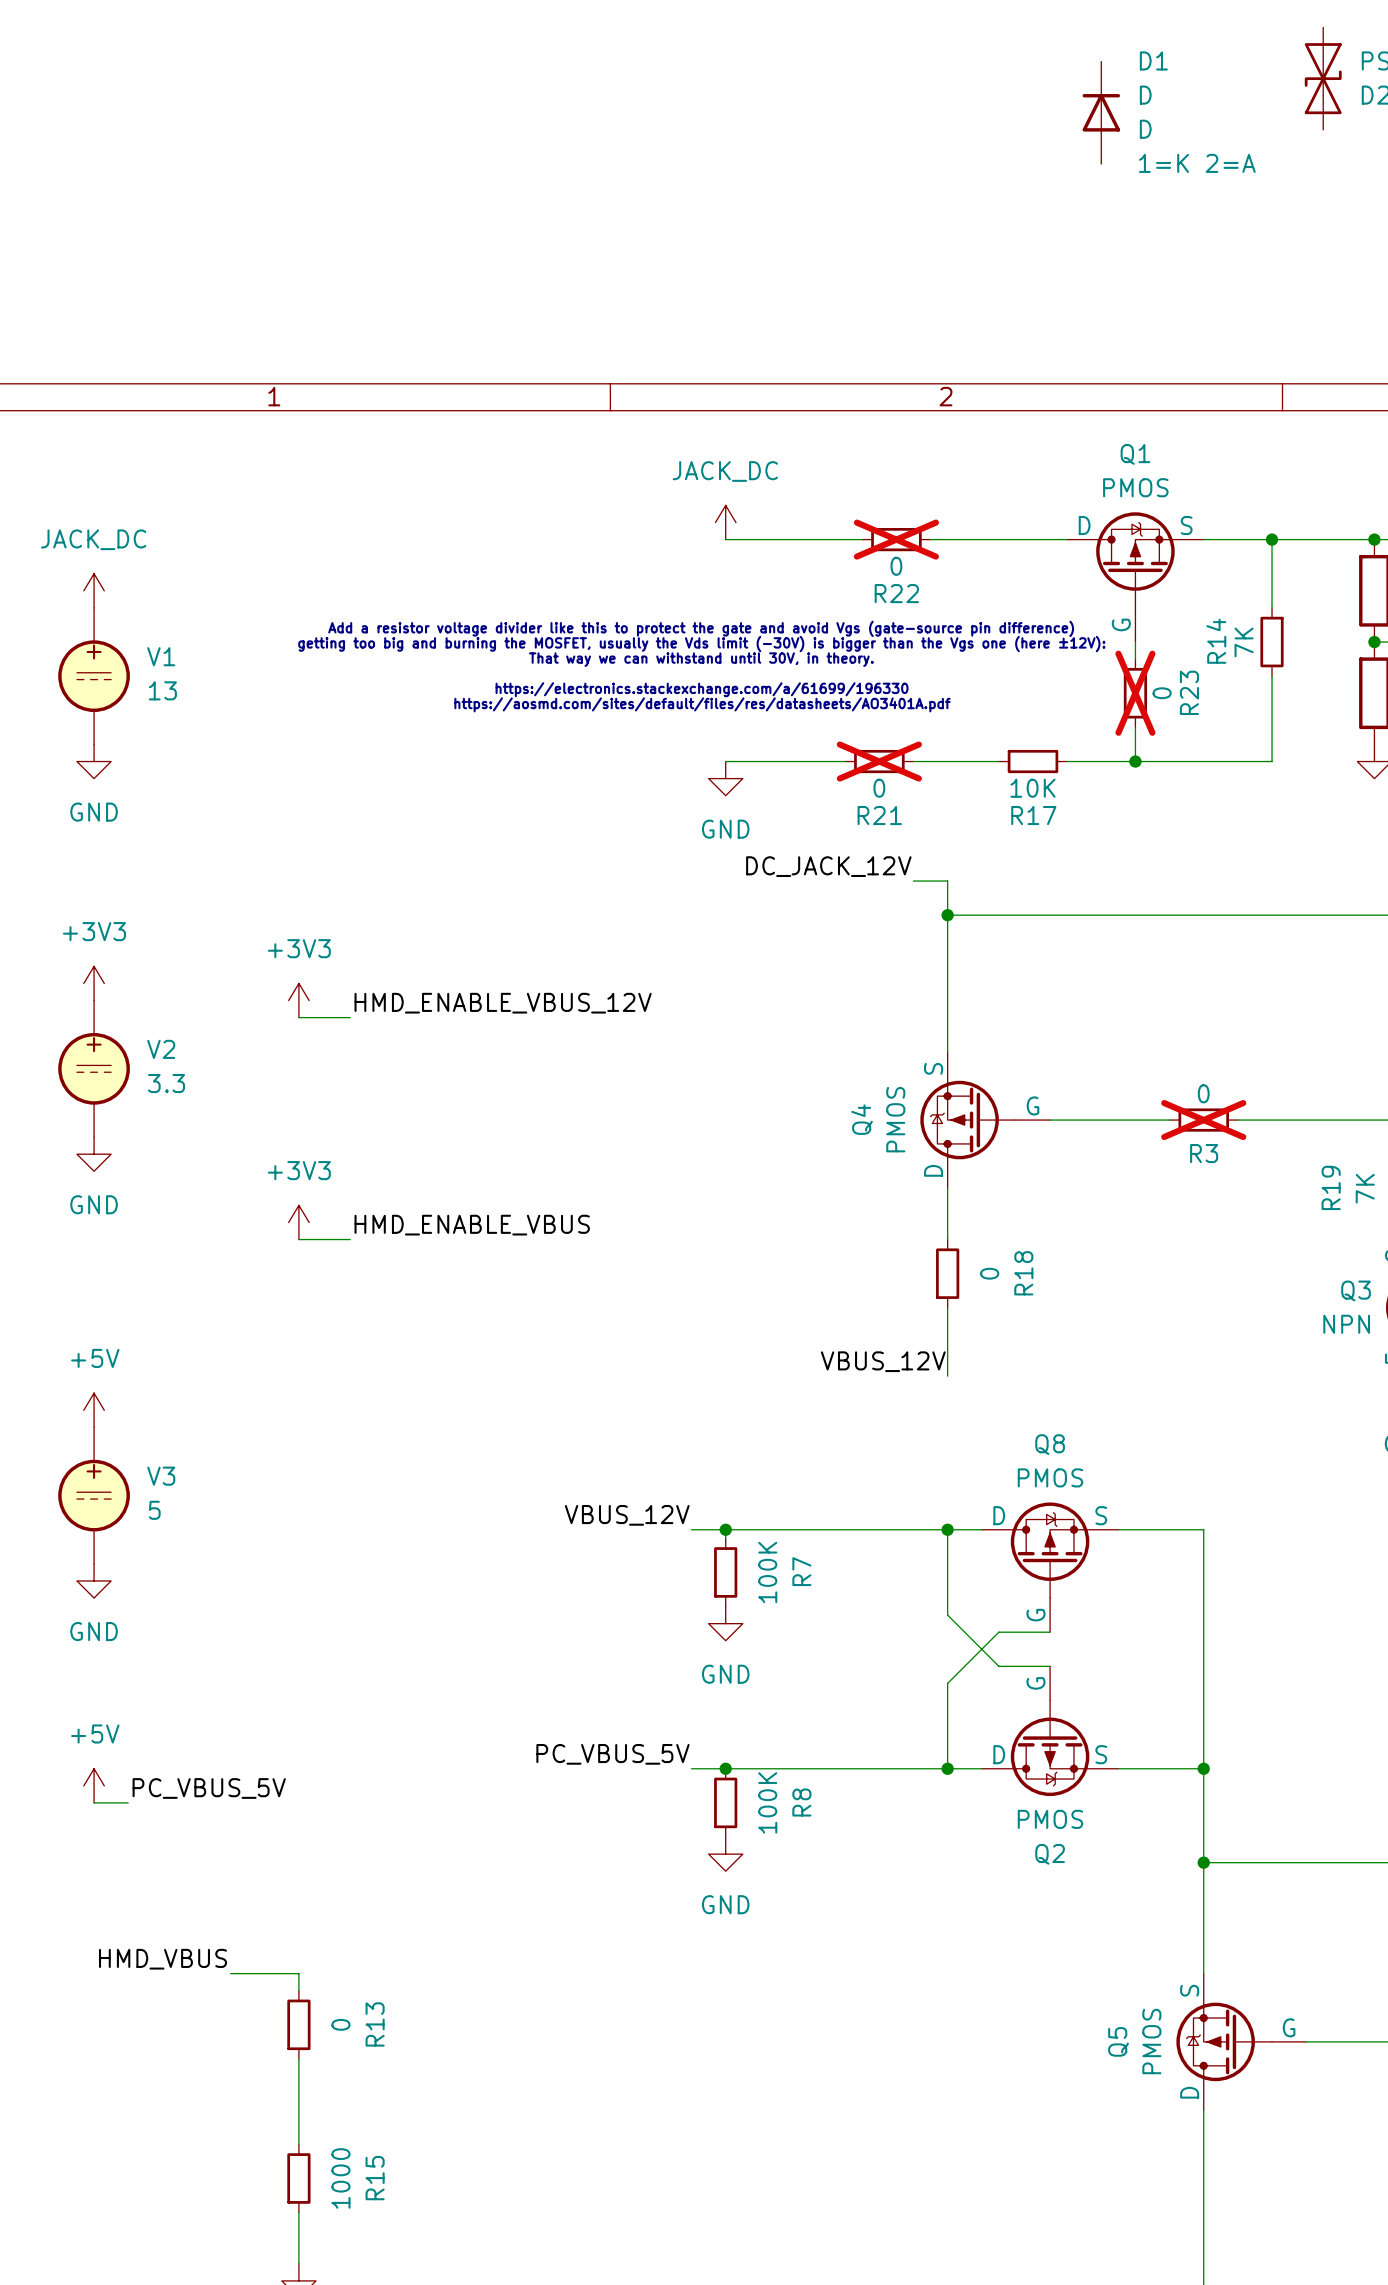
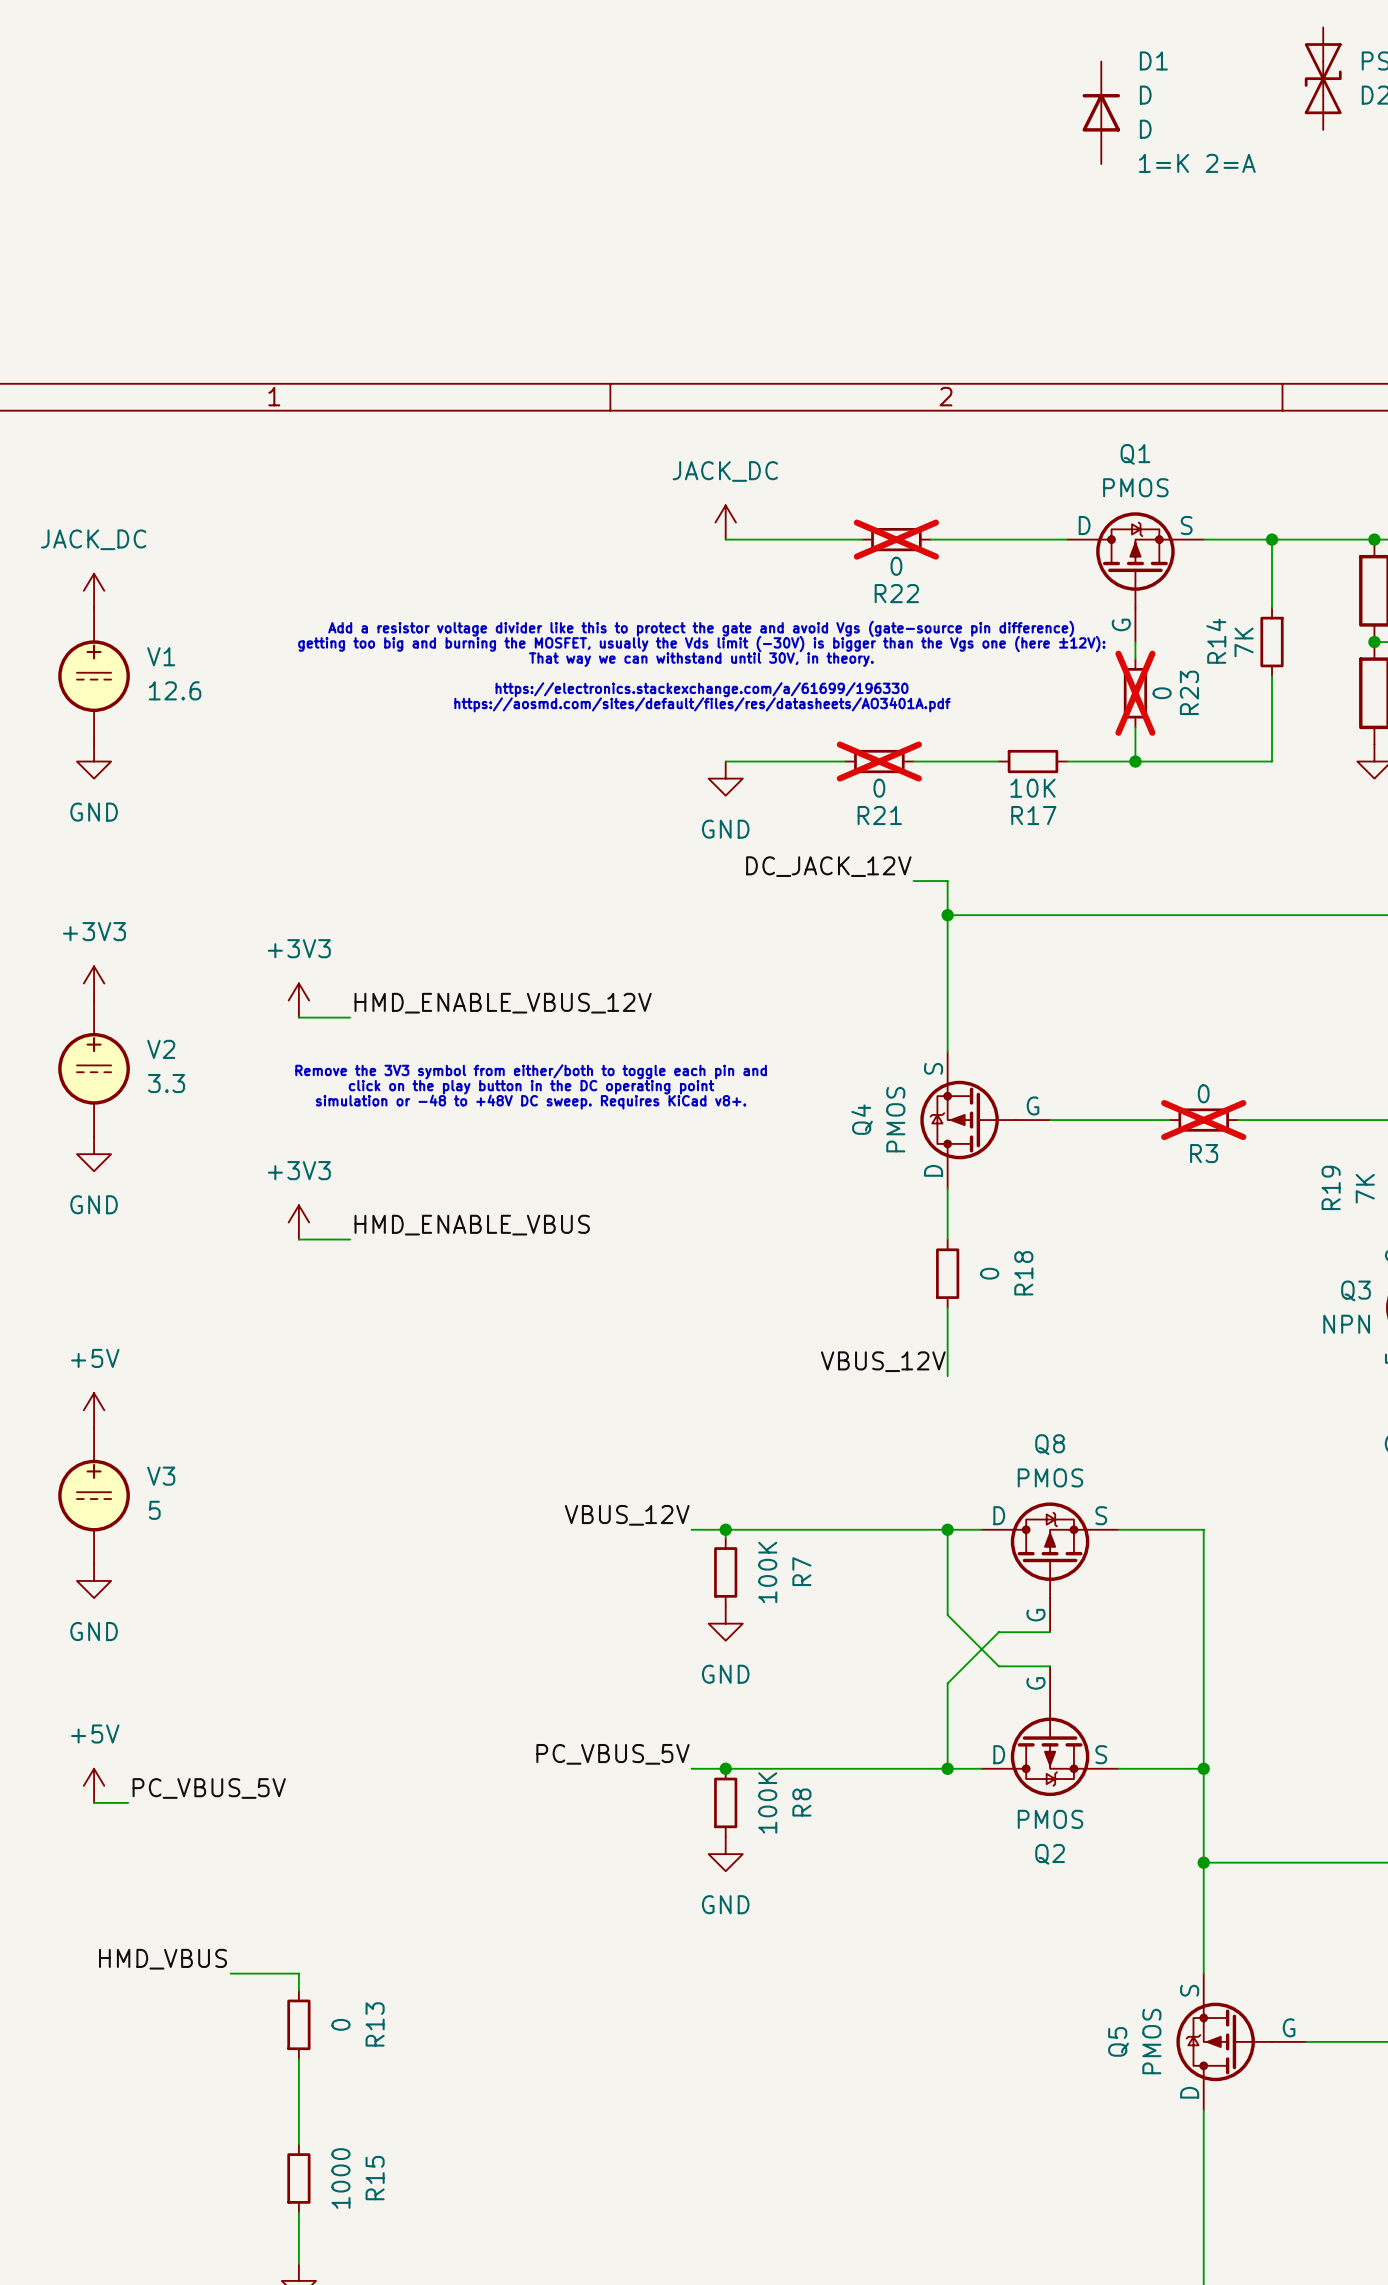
V1 value: 13 (162, 690) -> 12.6 (175, 690)
text: none -> Remove the 3V3 symbol from either/both to toggle each pin and (531, 1071)
text: none -> click on the play button in the DC operating point (531, 1087)
text: none -> simulation or -48 to +48V DC sweep. Requires KiCad v8+. (531, 1102)

